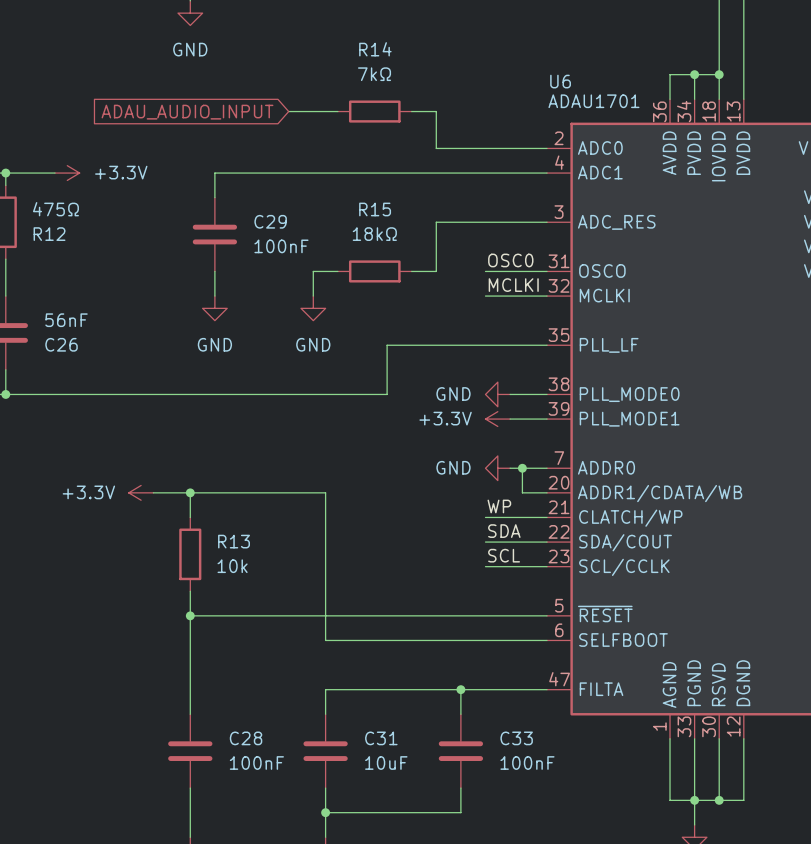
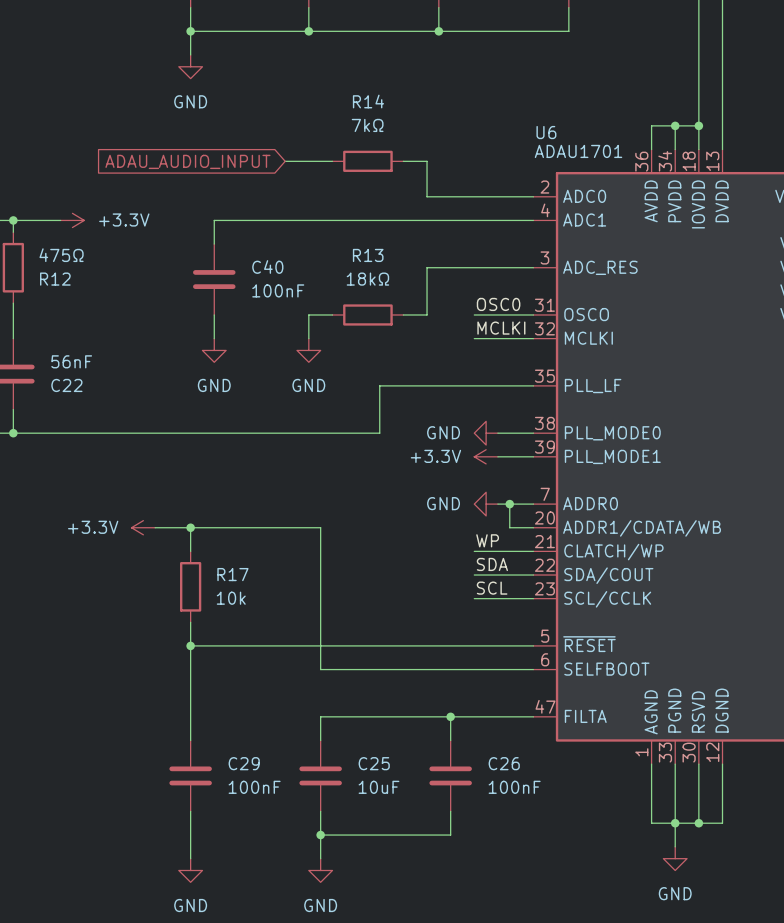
R15 name: R15 (375, 209) -> R13 (368, 255)
C29 name: C29 (270, 221) -> C40 (267, 266)
C26 name: C26 (61, 344) -> C22 (66, 385)
R13 name: R13 (234, 541) -> R17 (232, 574)
C28 name: C28 (246, 738) -> C29 (244, 763)
C31 name: C31 (381, 738) -> C25 (374, 763)
C33 name: C33 (516, 738) -> C26 (504, 763)

